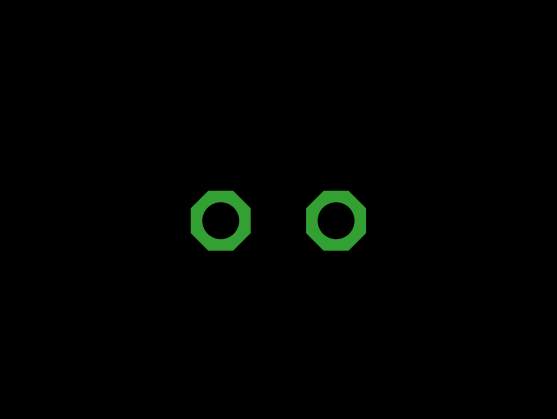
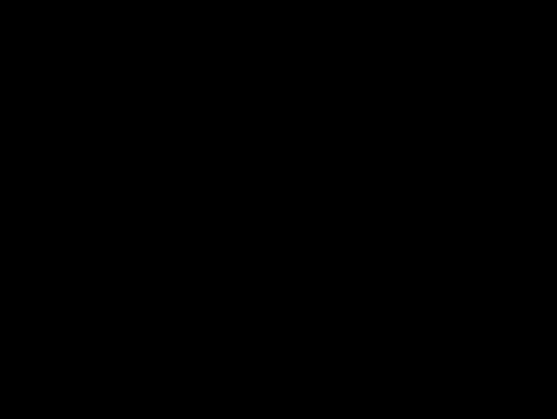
part: (278, 220) -> none

